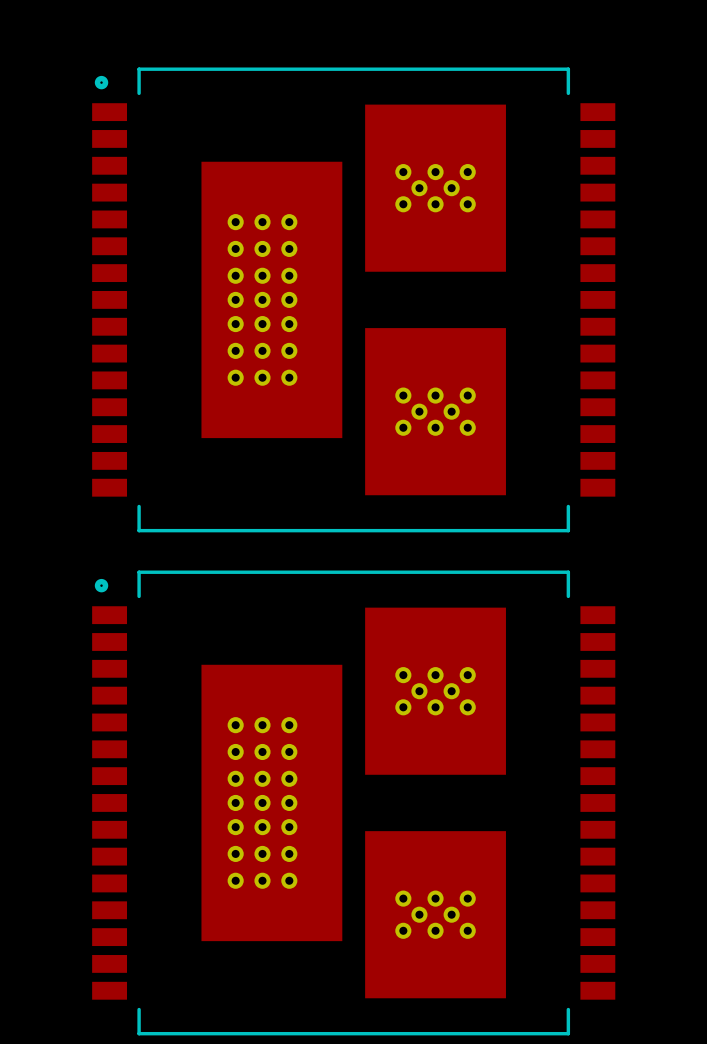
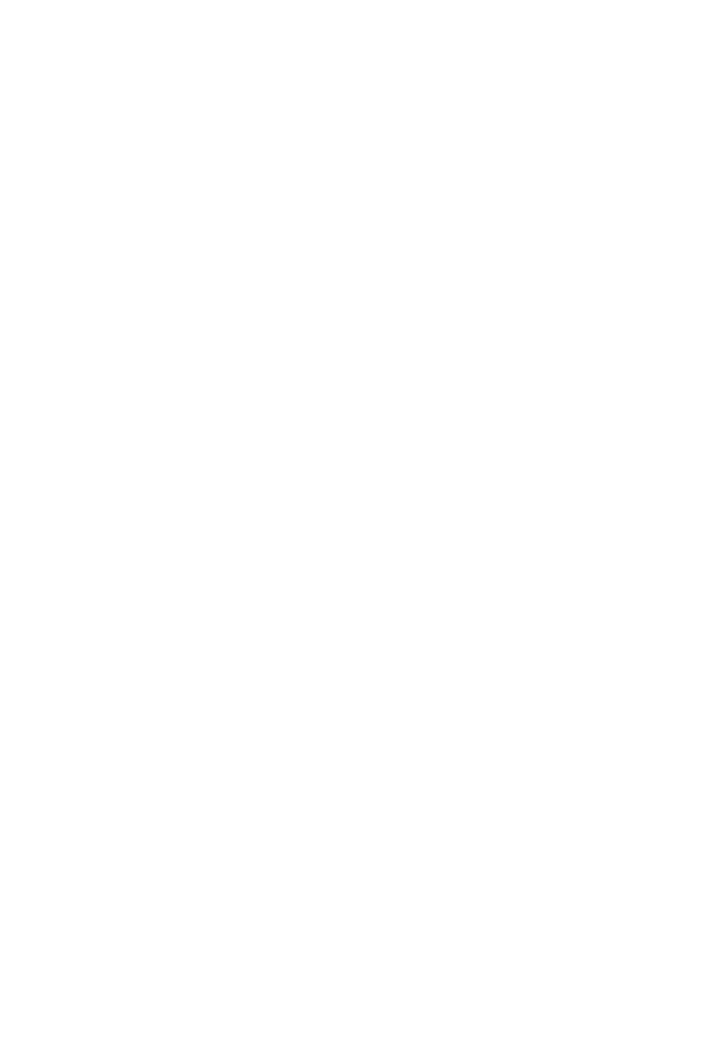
part: (353, 299) -> none
part: (353, 802) -> none

